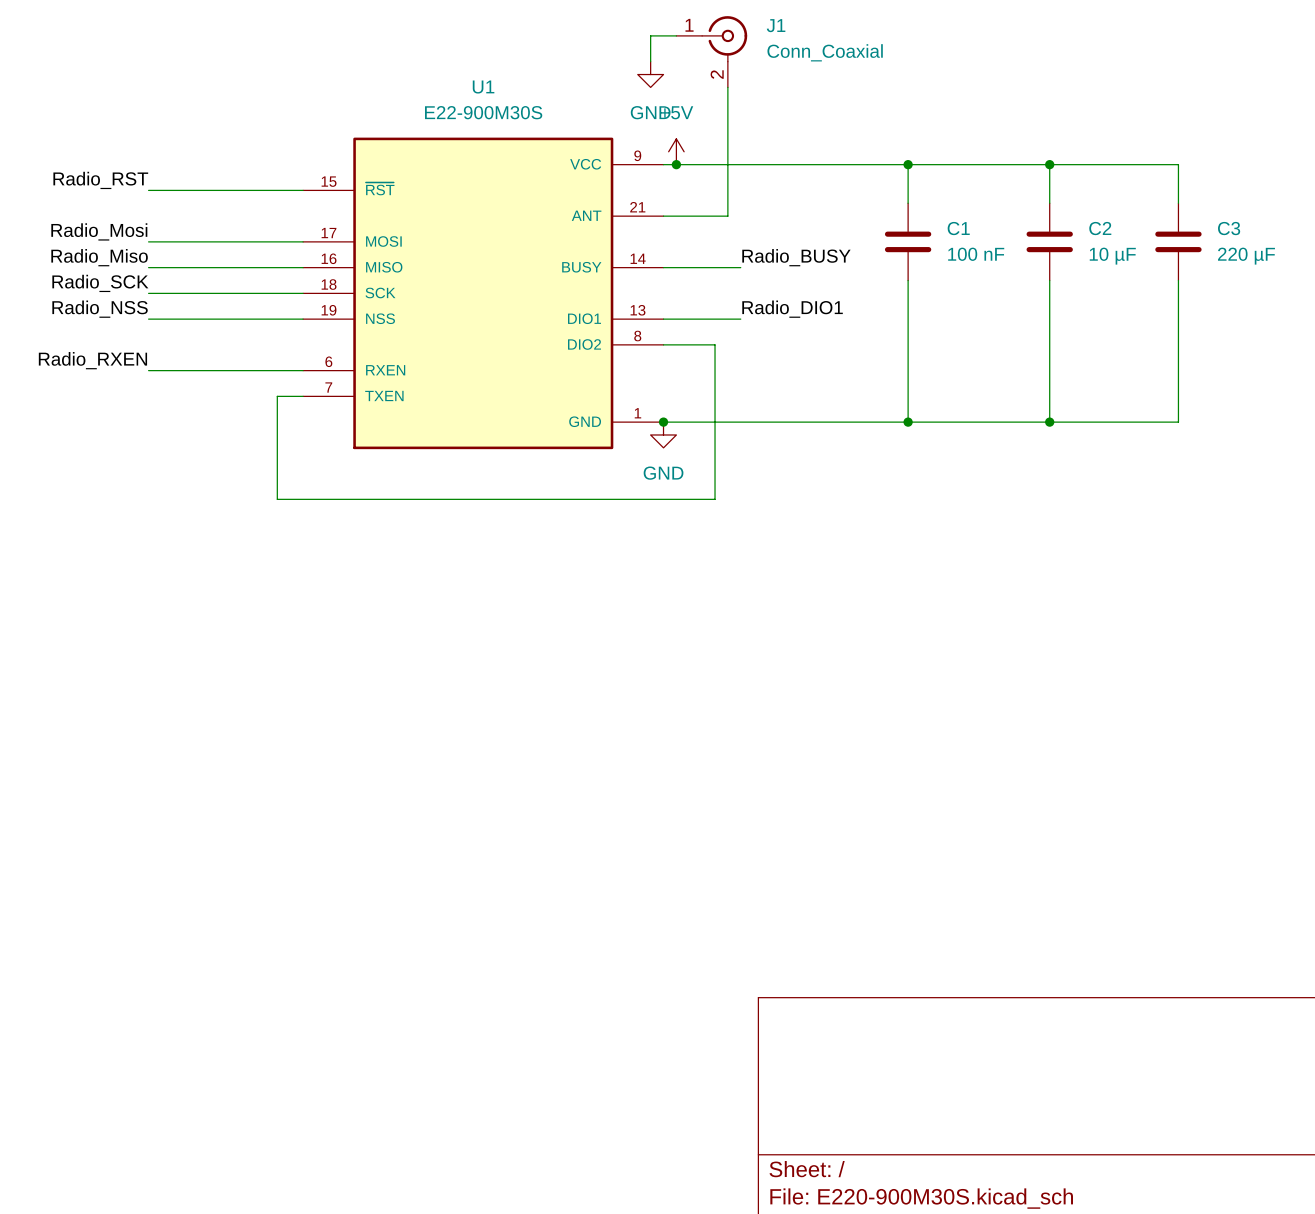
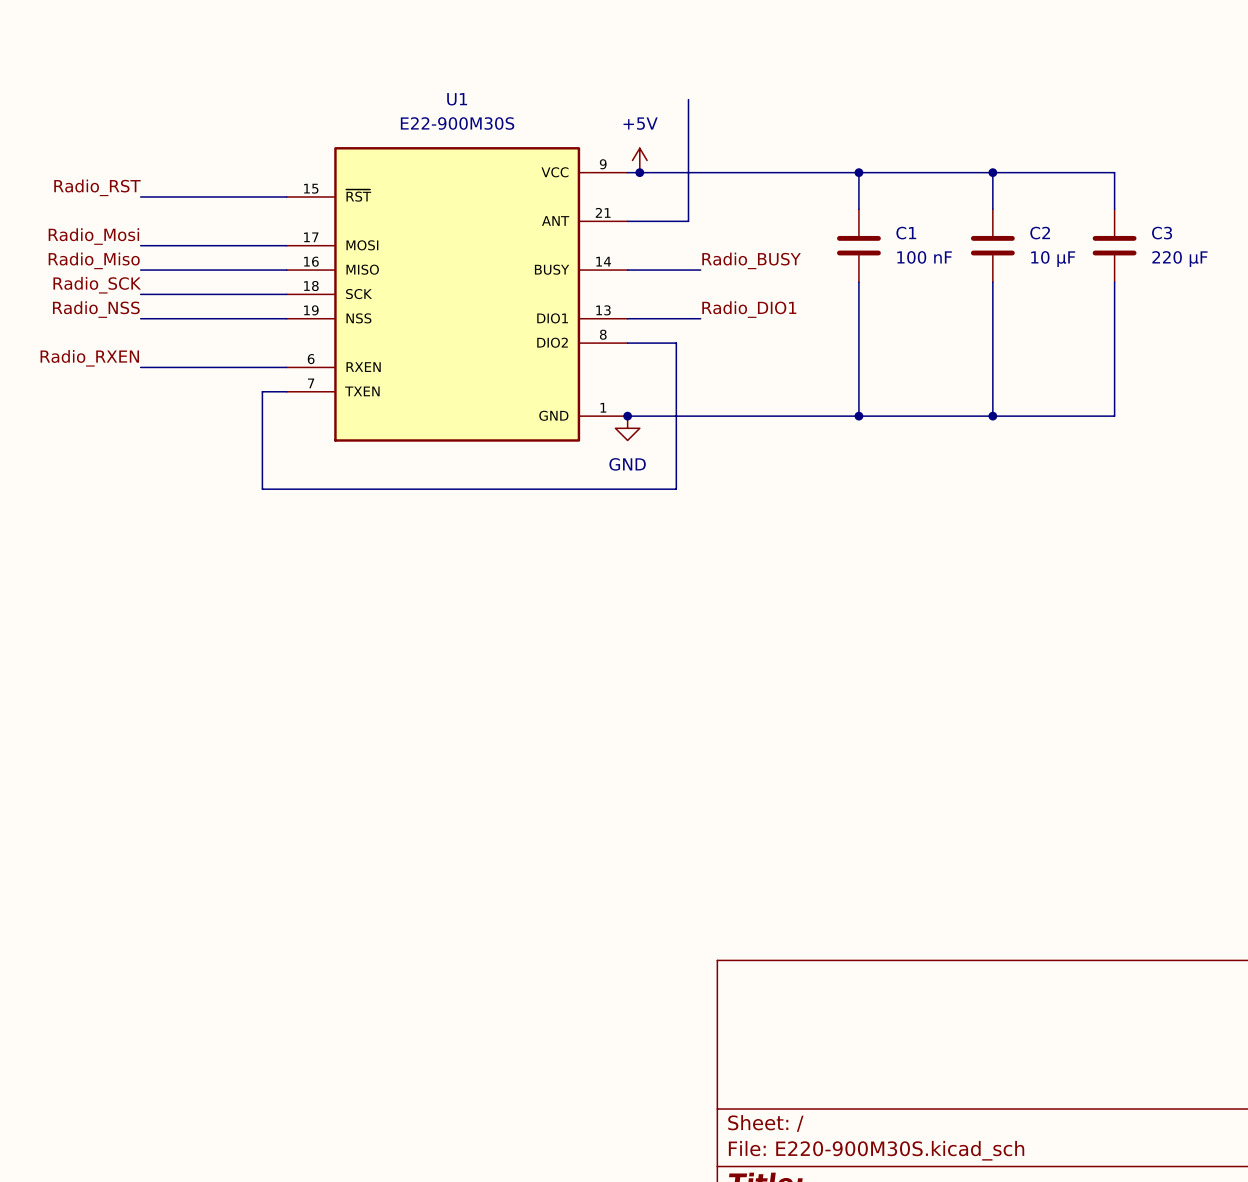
wire: (676, 35) (650, 35) (650, 61) -> none
J1: Conn_Coaxial (711, 51) -> none
power symbol: GND (650, 74) -> none

